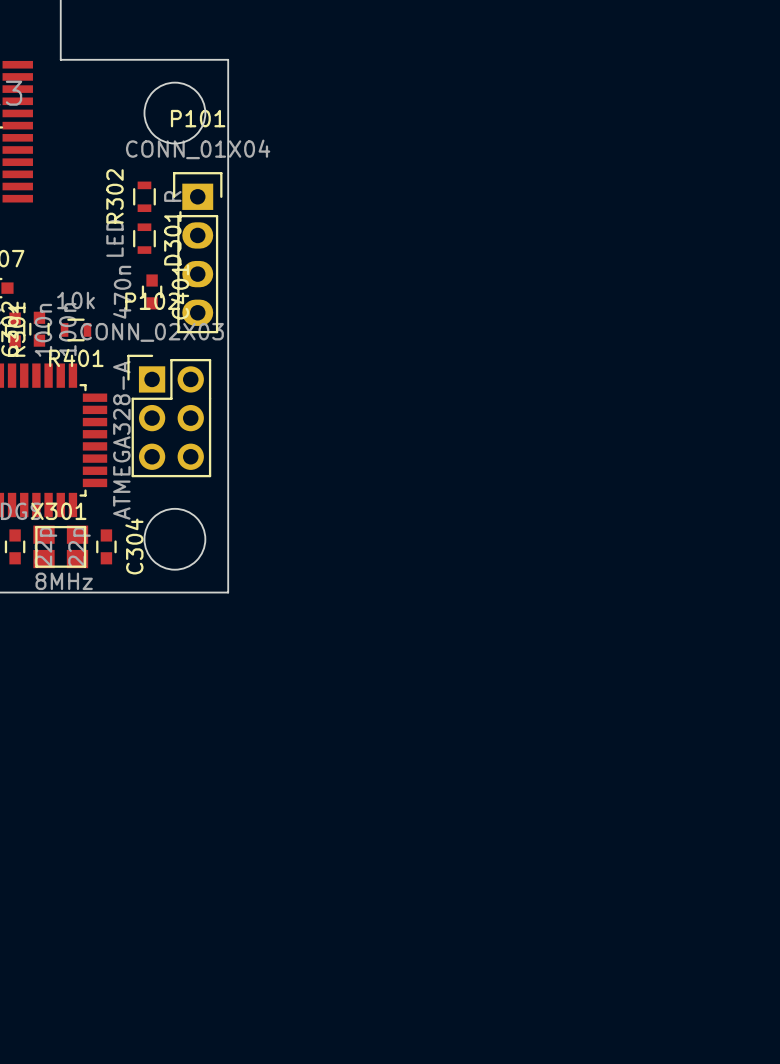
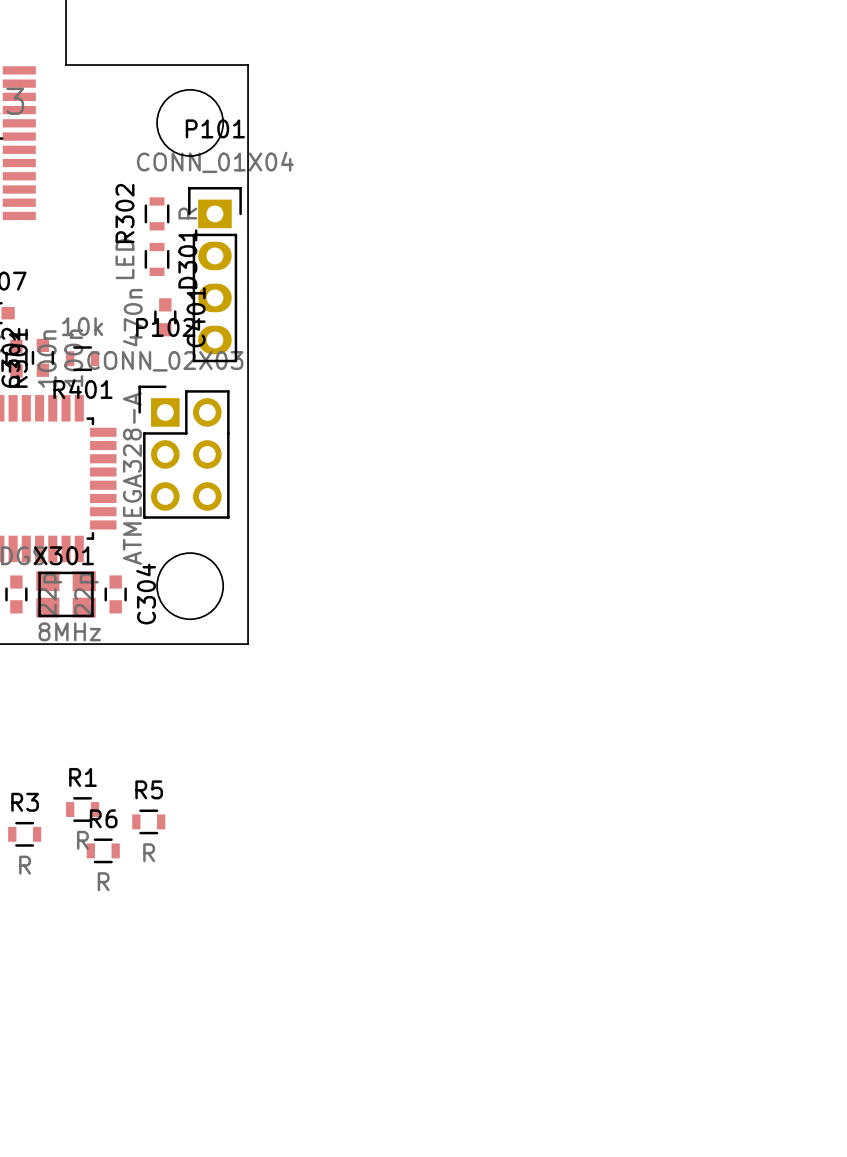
R1: none -> R (82, 809)
R5: none -> R (148, 821)
R3: none -> R (24, 834)
R6: none -> R (103, 850)

